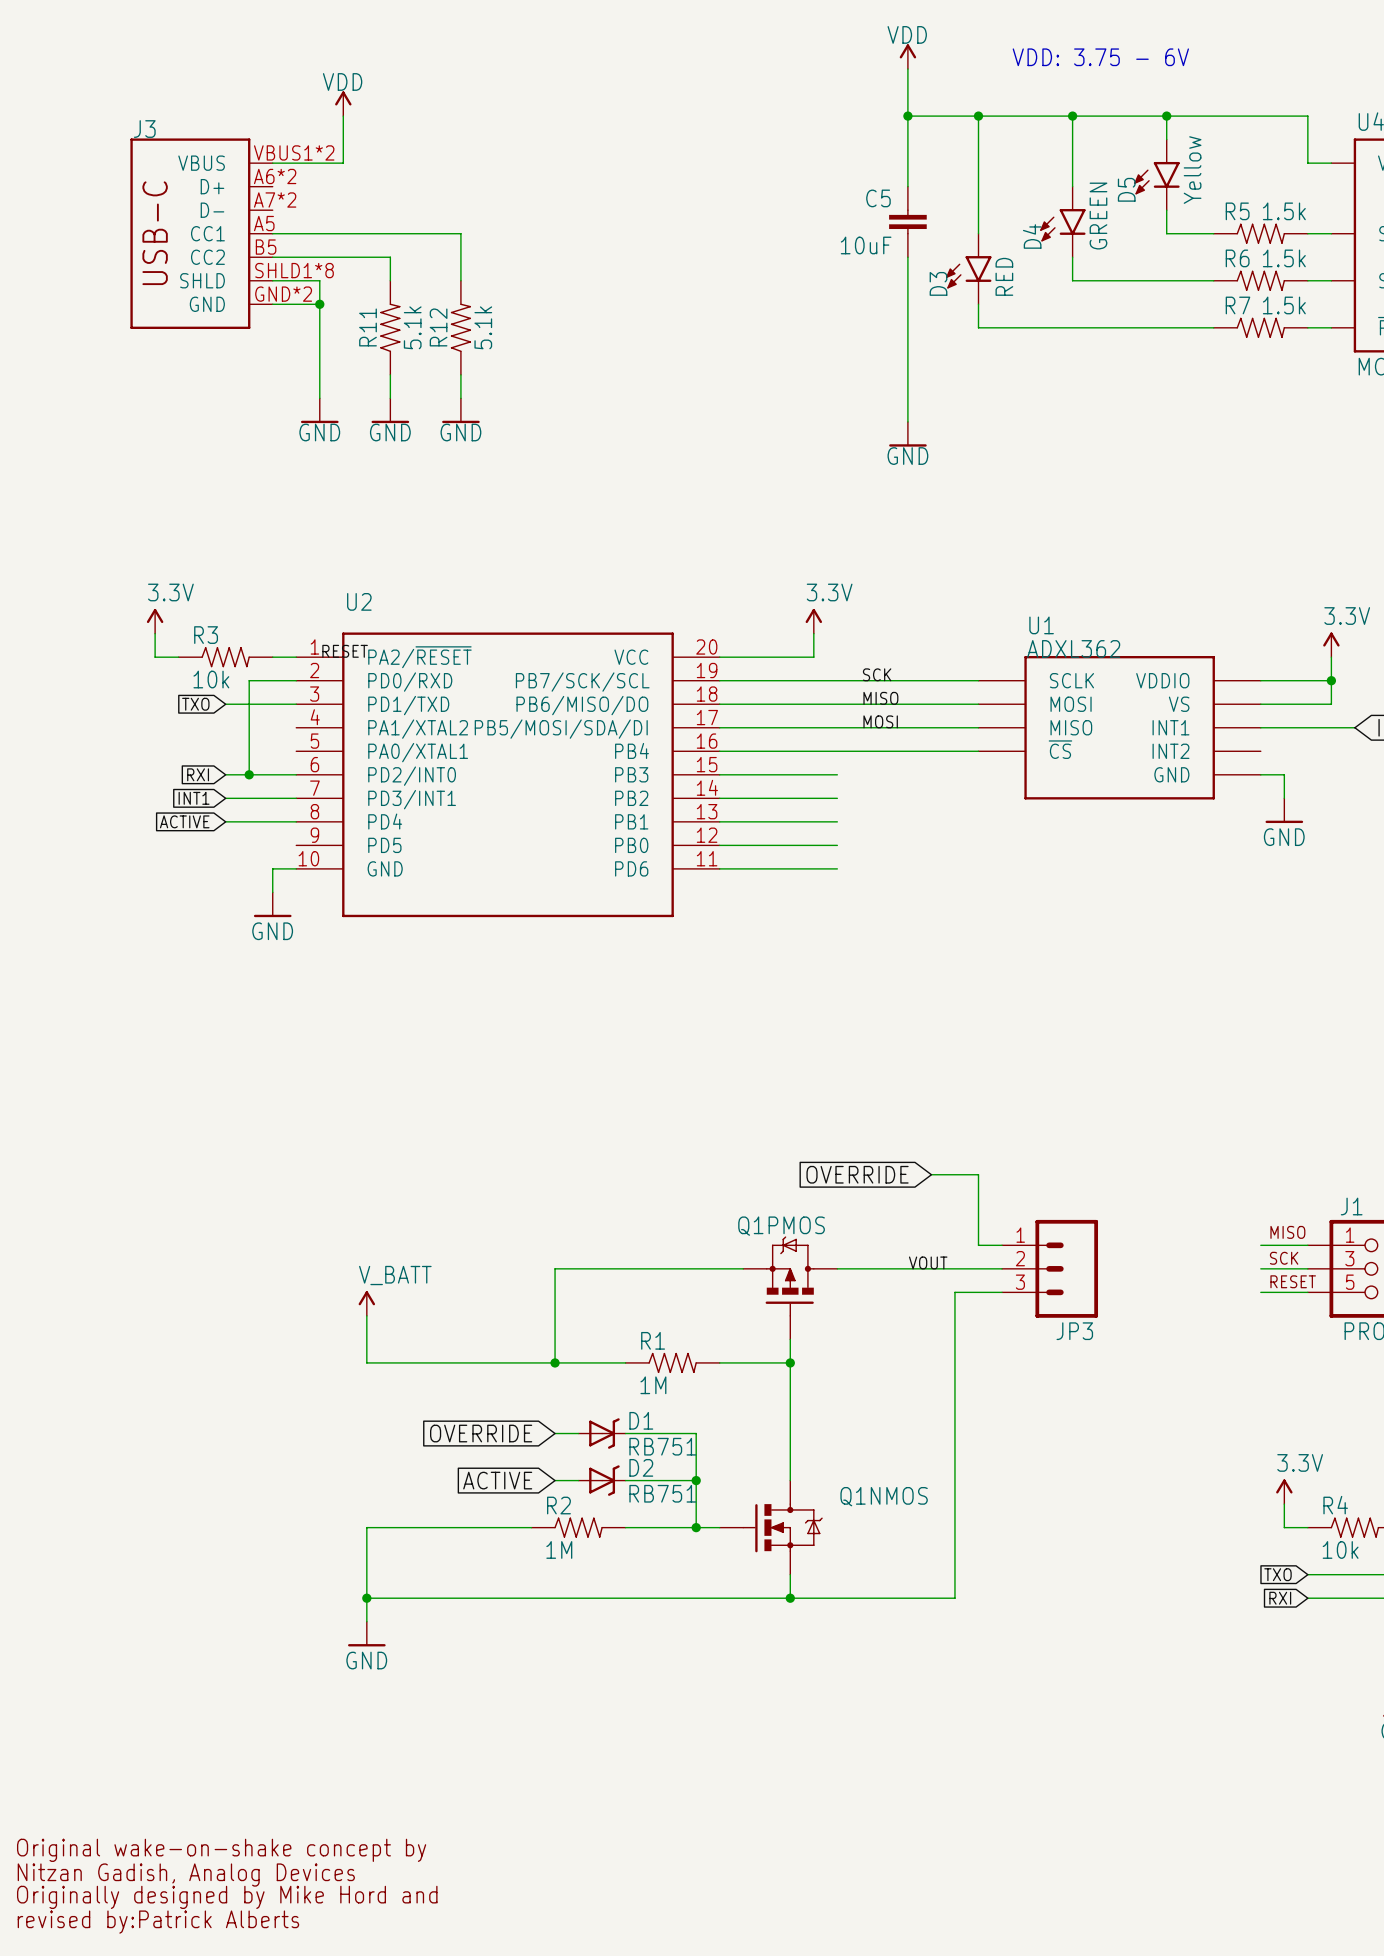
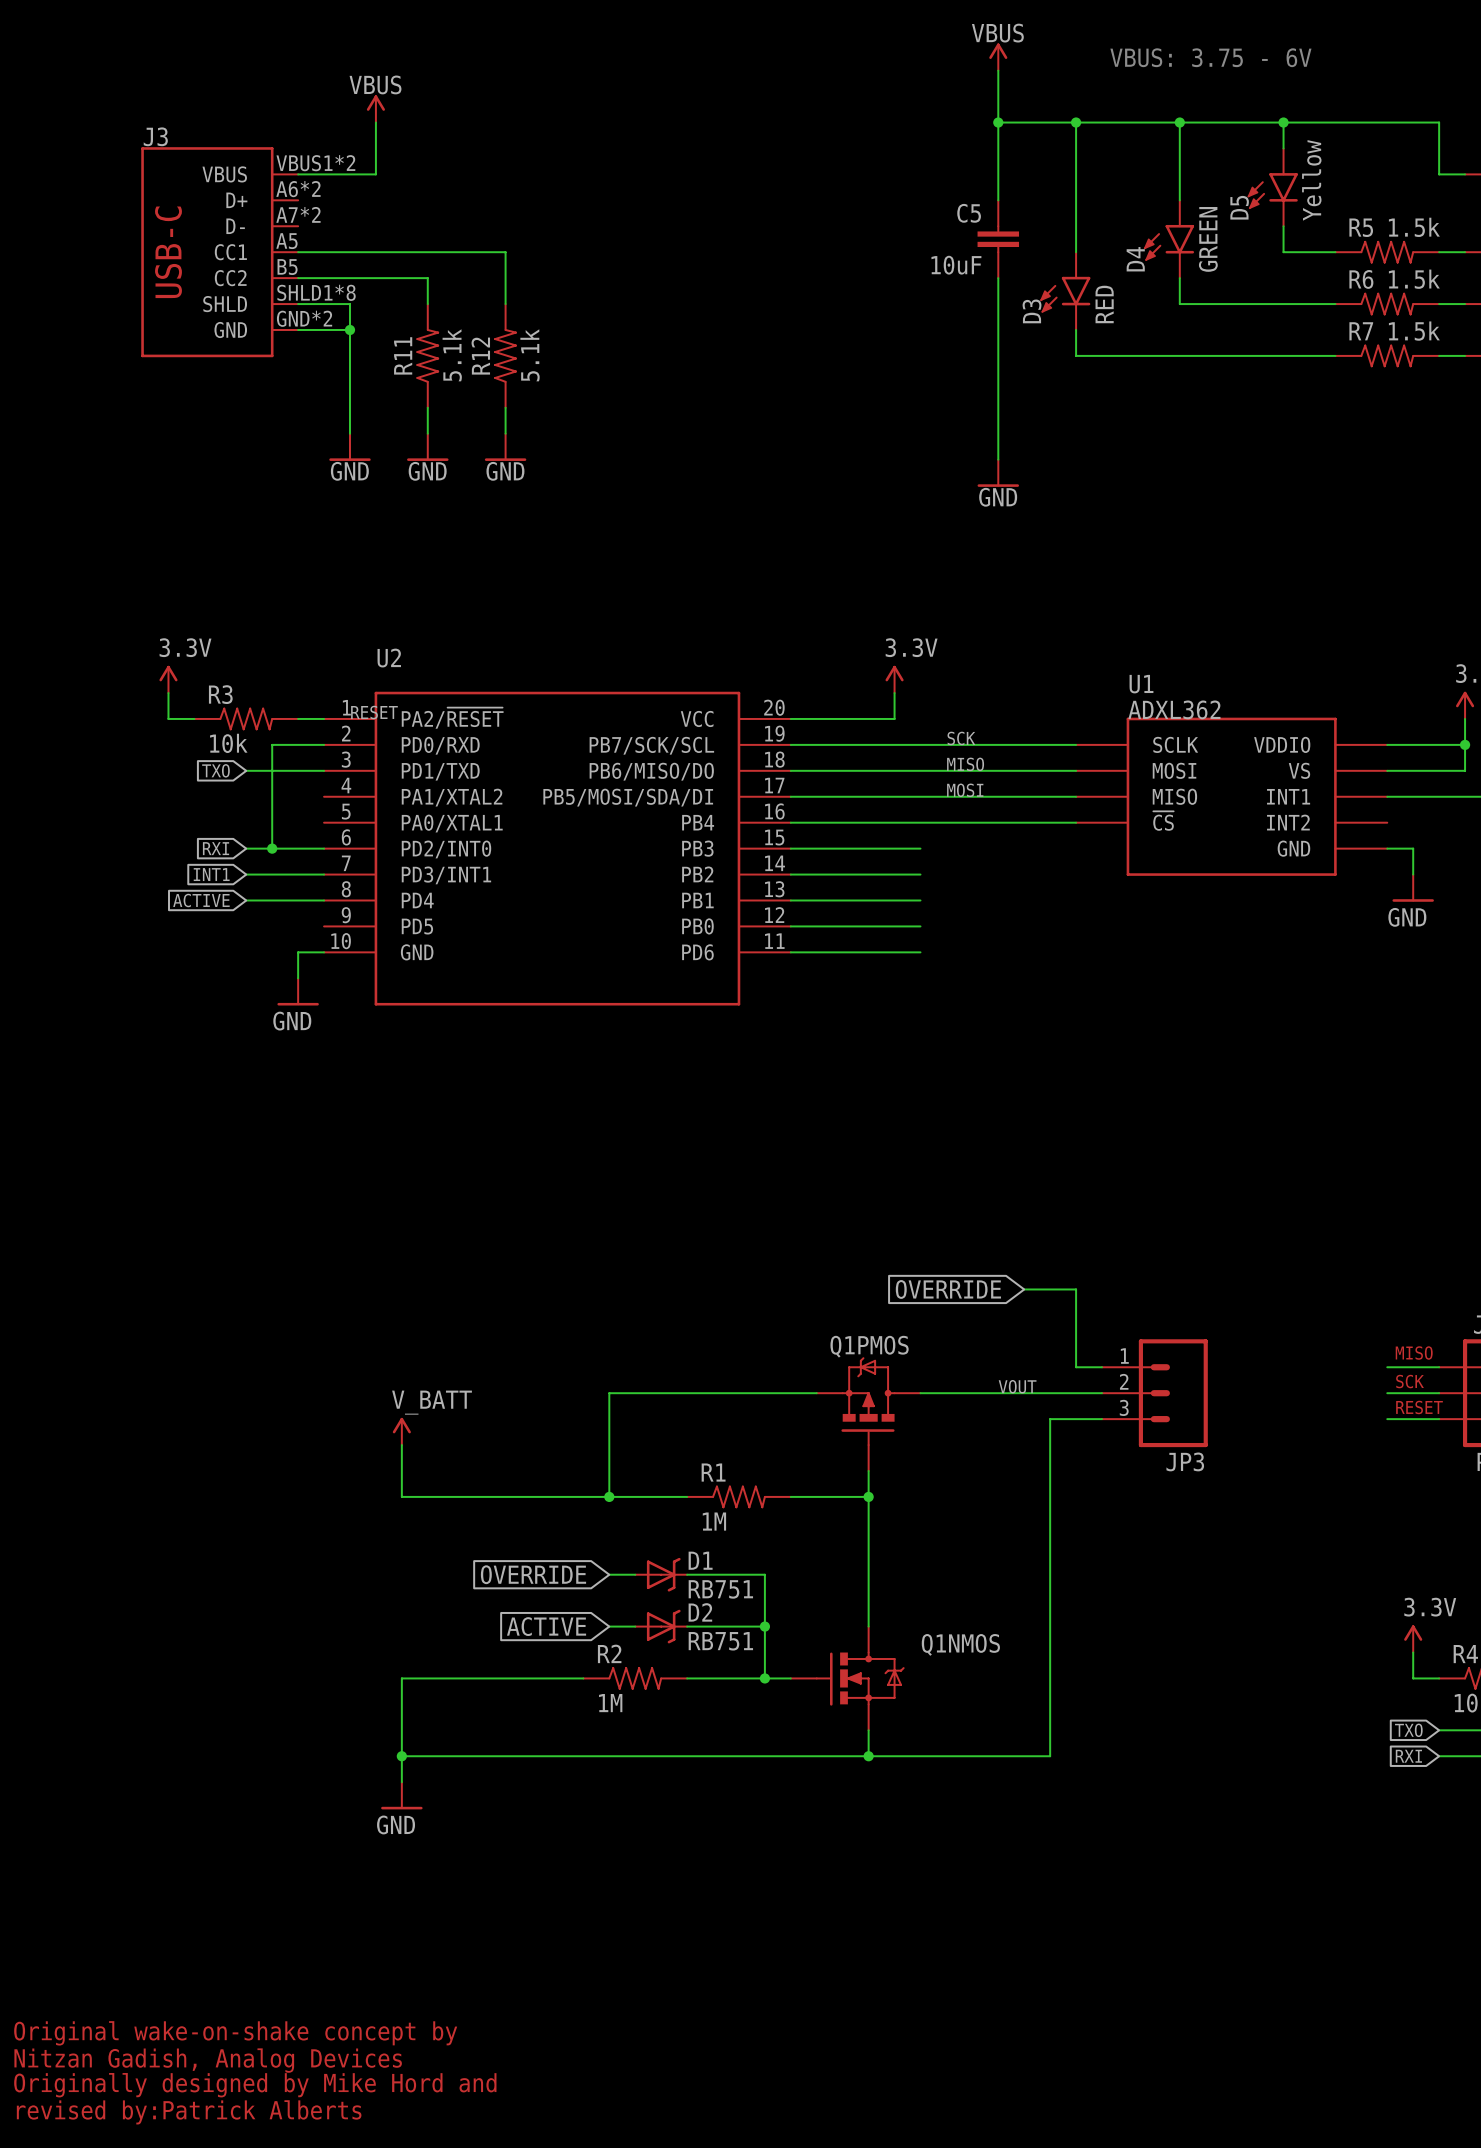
power symbol: VDD (907, 56) -> VBUS (998, 57)
text: VDD: 3.75 - 6V (1100, 57) -> VBUS: 3.75 - 6V (1210, 57)
power symbol: VDD (343, 103) -> VBUS (375, 108)

